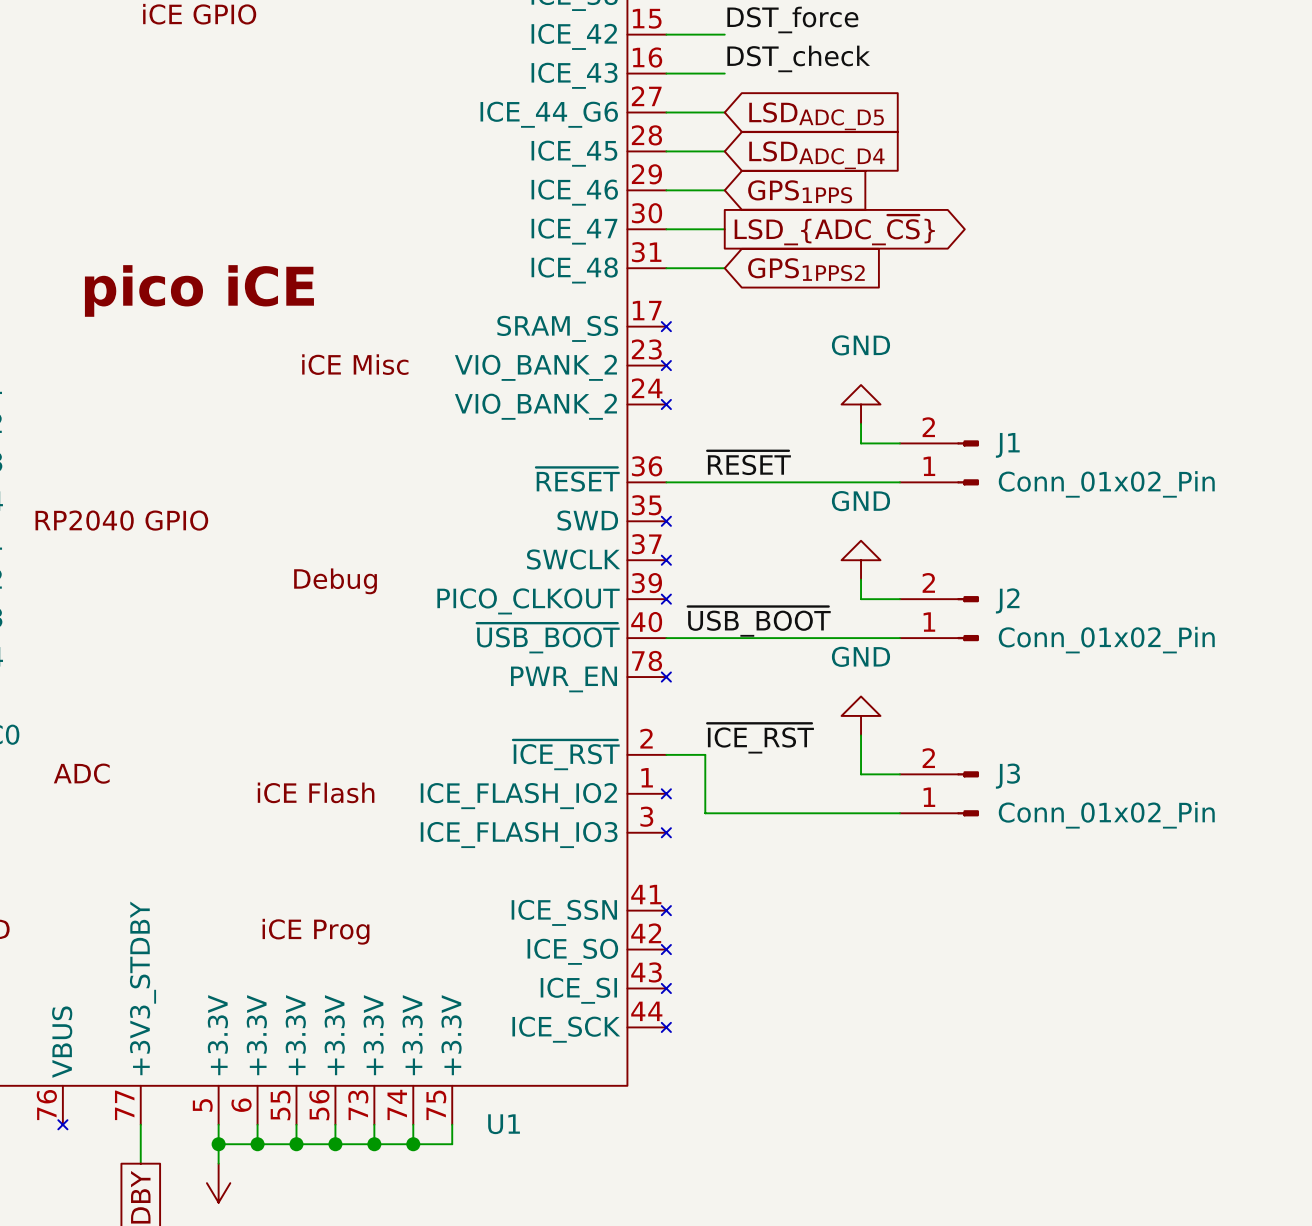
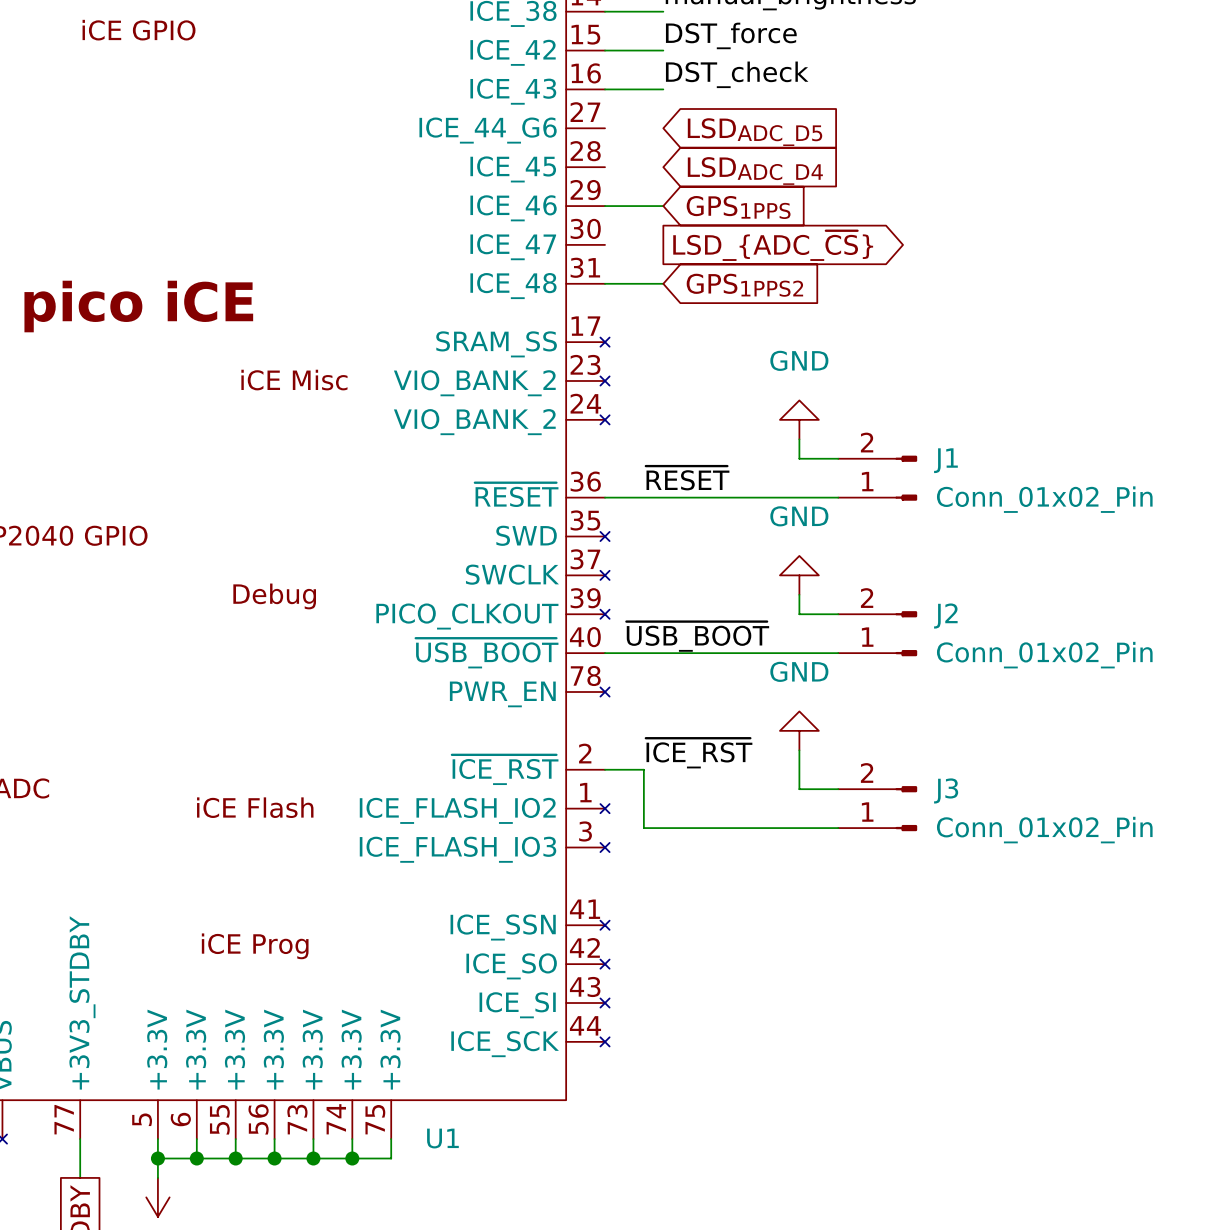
wire: (666, 112) (724, 112) -> none
wire: (666, 151) (724, 151) -> none
wire: (666, 229) (724, 229) -> none

